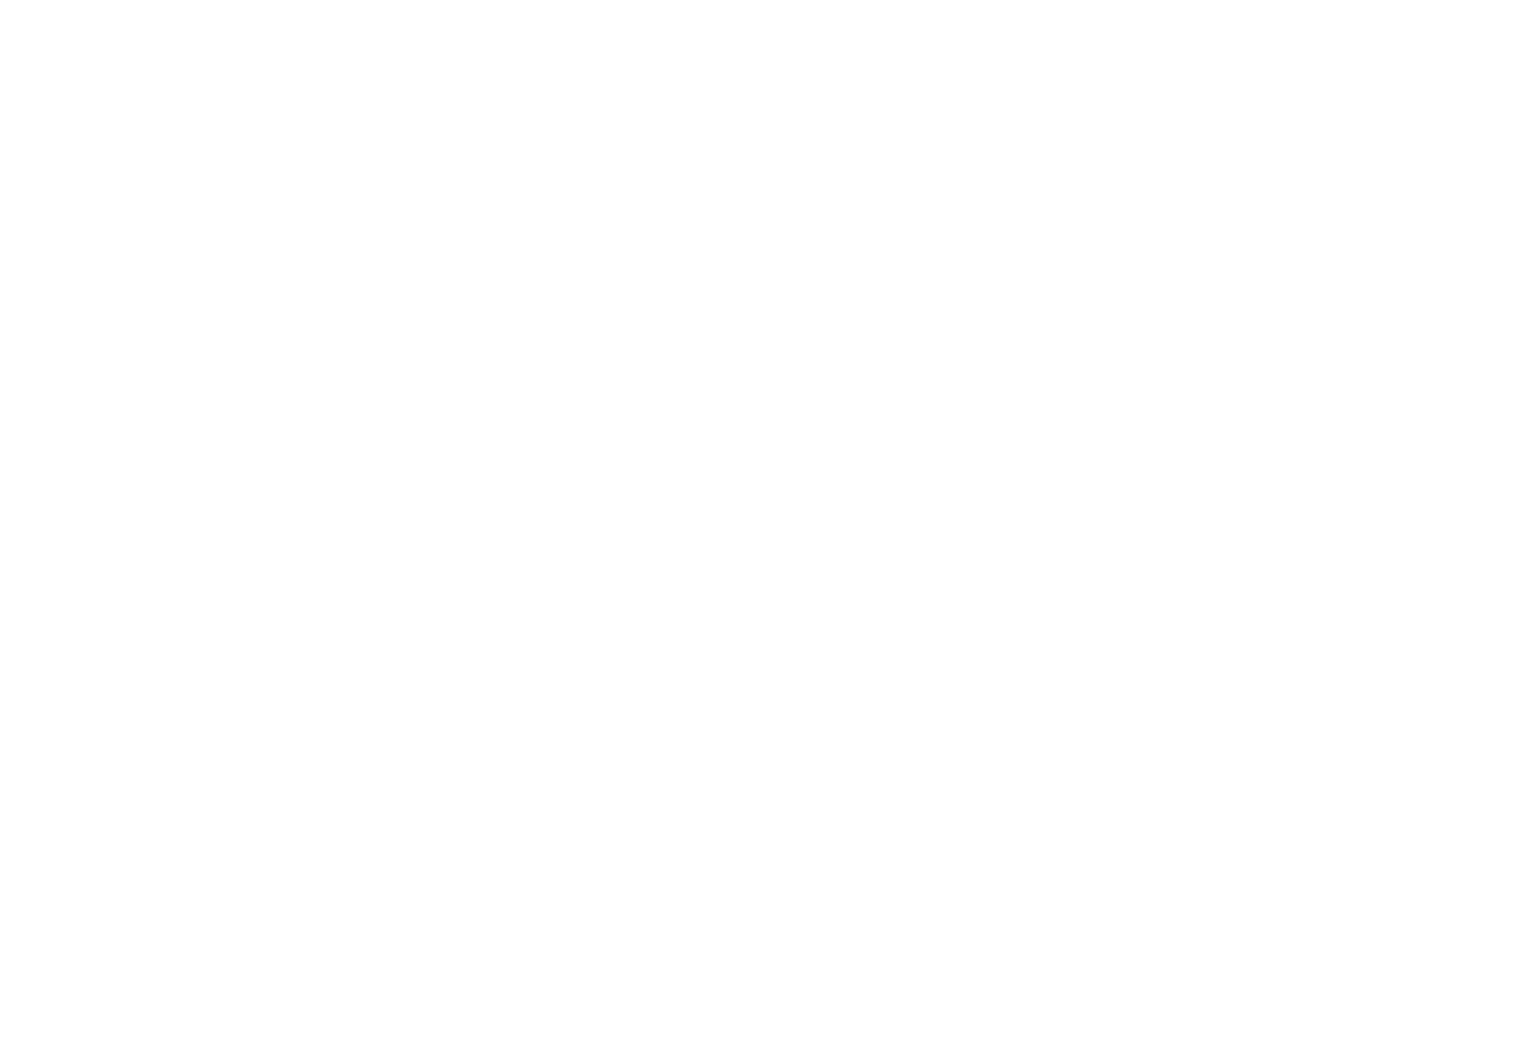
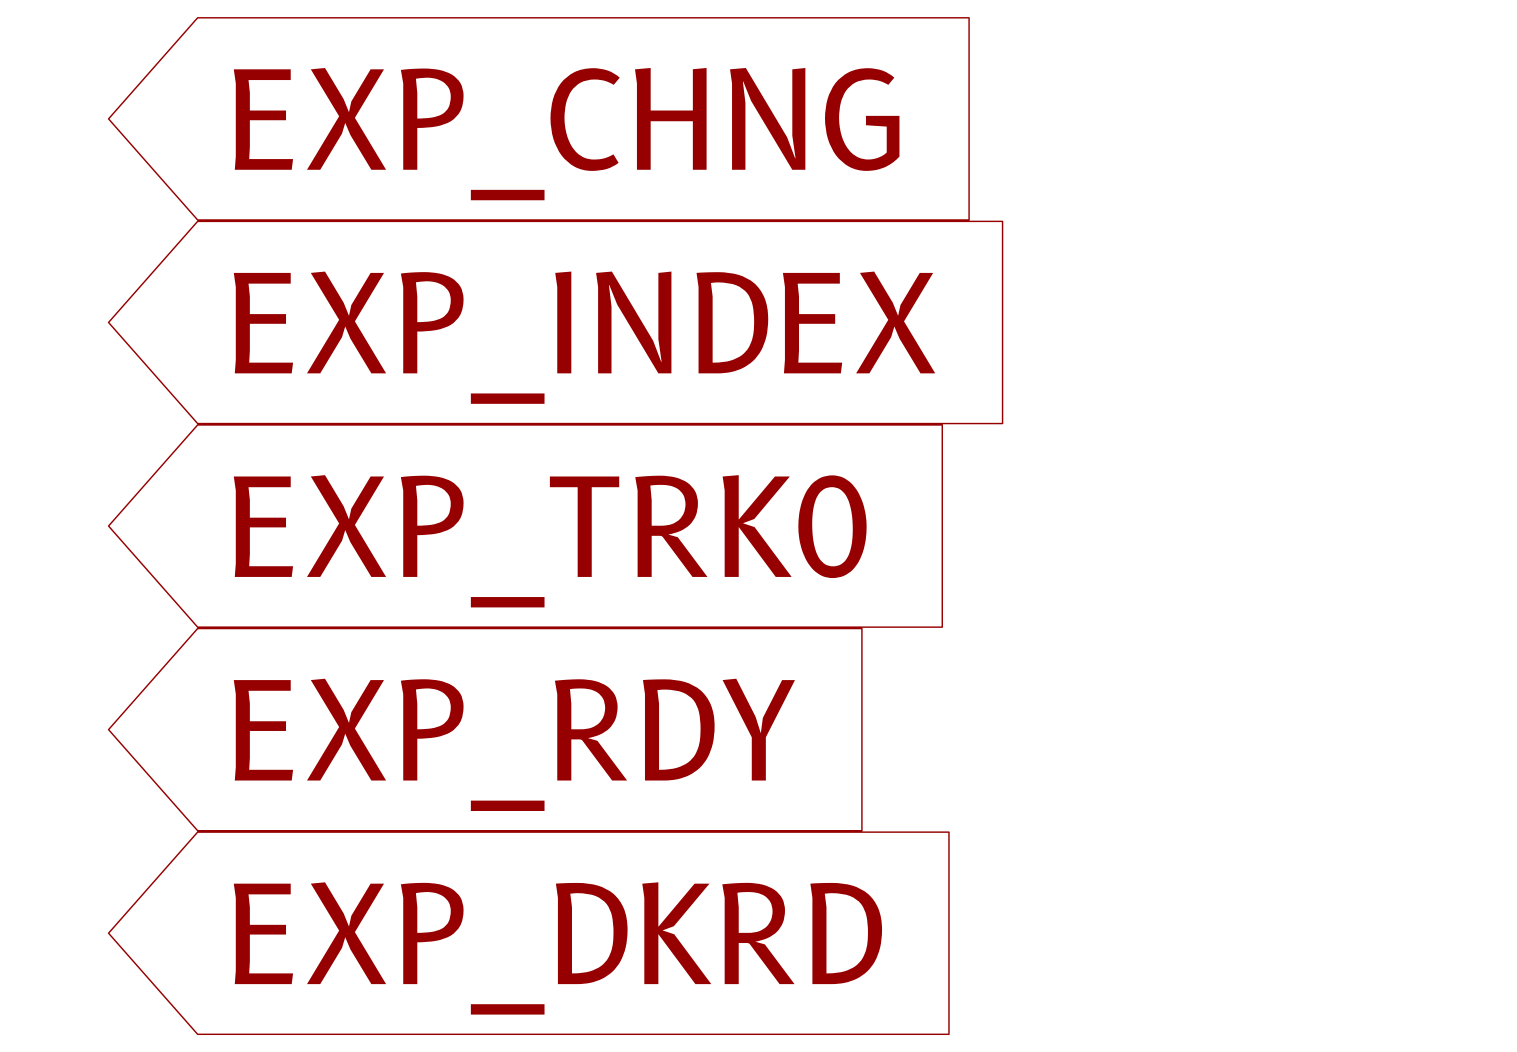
global label: none -> EXP_CHNG (566, 134)
global label: none -> EXP_INDEX (584, 337)
global label: none -> EXP_TRK0 (550, 541)
global label: none -> EXP_RDY (514, 744)
global label: none -> EXP_DKRD (557, 948)

